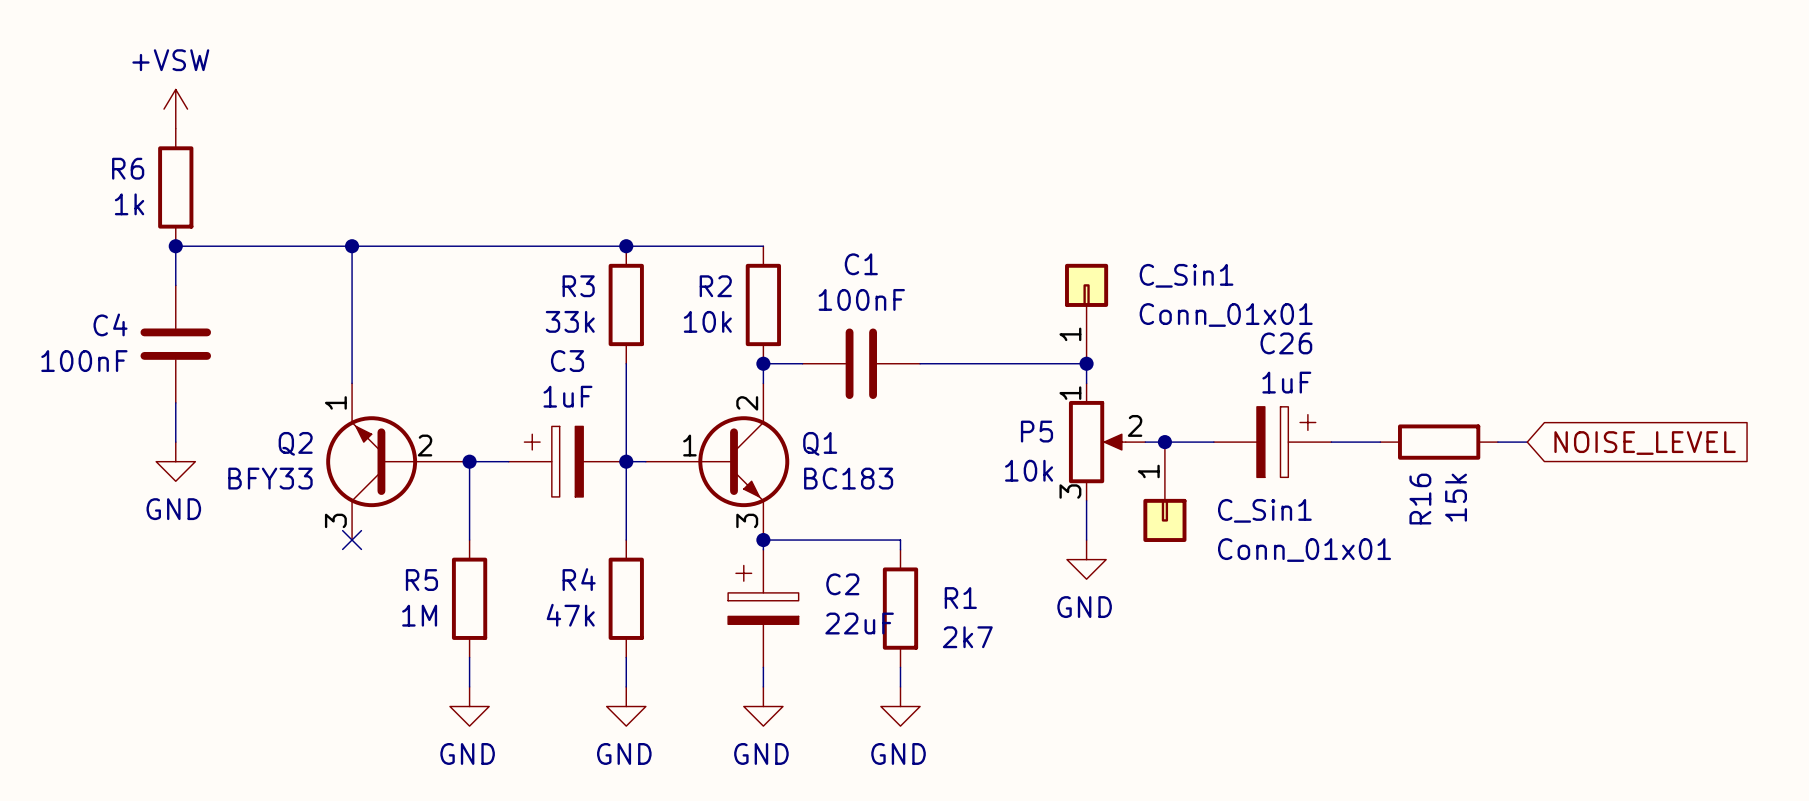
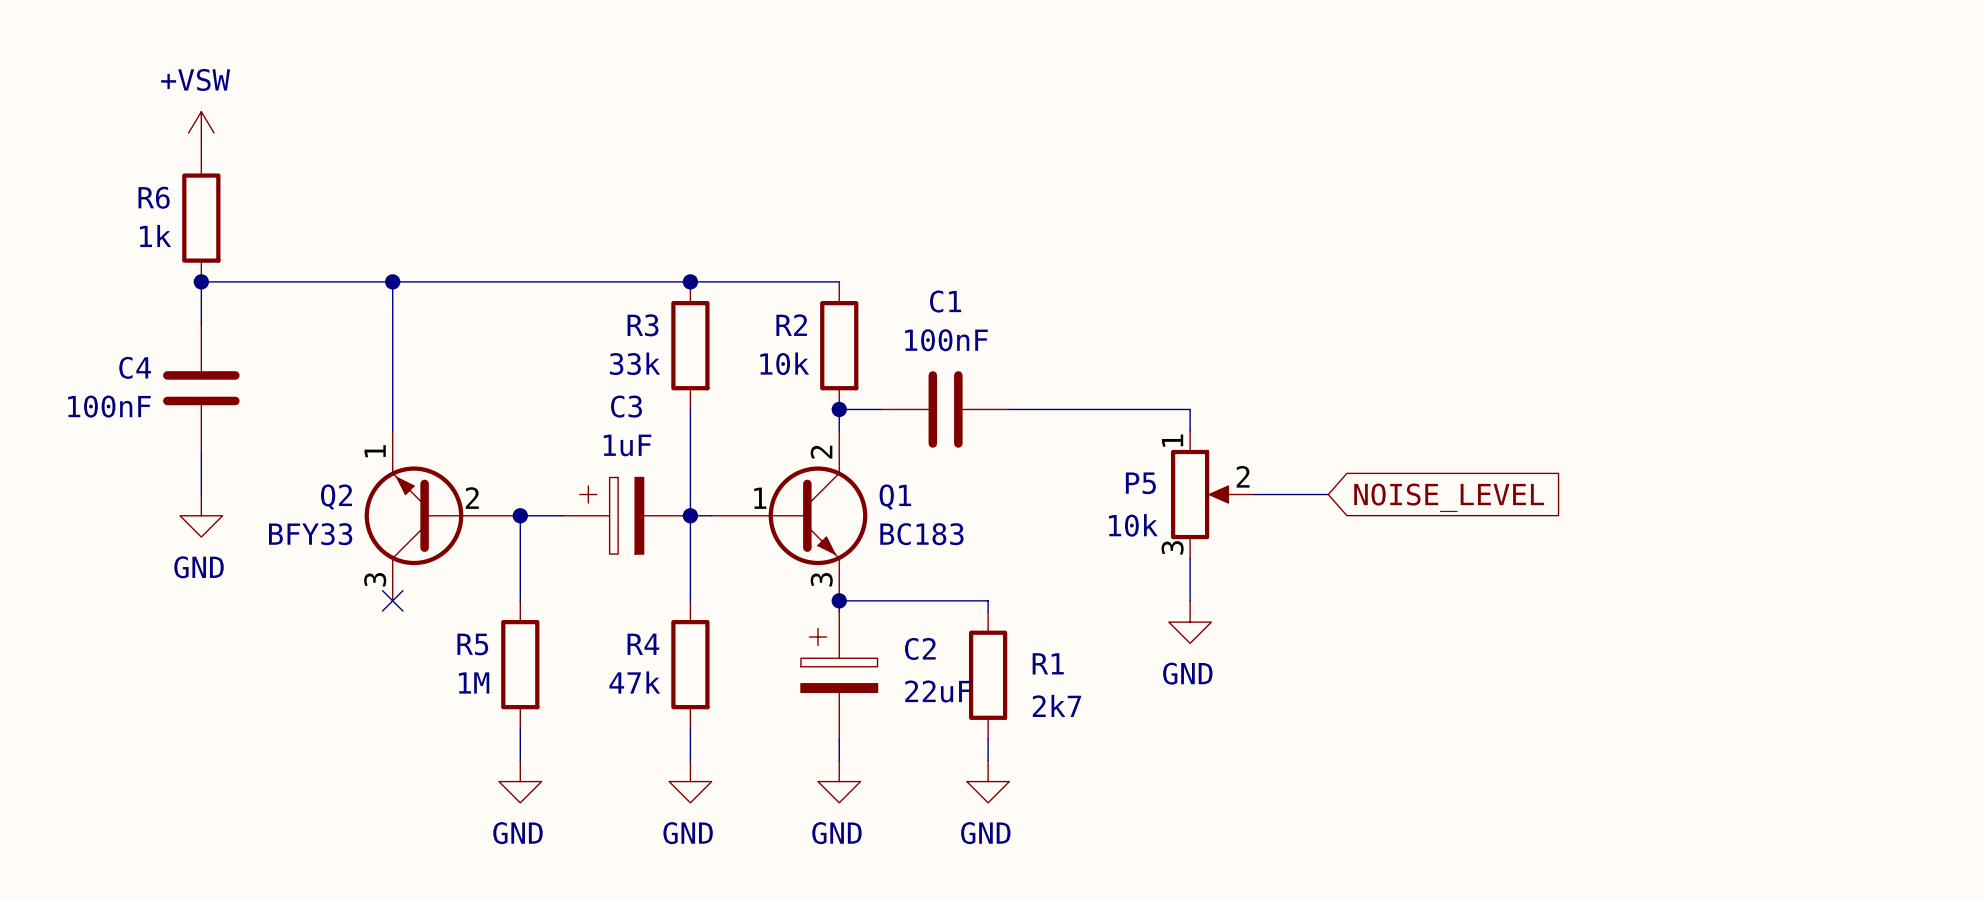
C_Sin1: Conn_01x01 (1086, 313) -> none
junction: (1086, 363) -> none
junction: (1164, 442) -> none
C26: 1uF (1272, 442) -> none
wire: (1331, 442) (1380, 442) -> none
R16: 15k (1439, 442) -> none
wire: (1497, 442) (1527, 442) -> none
global label position: NOISE_LEVEL (1645, 443) -> NOISE_LEVEL (1449, 497)
C_Sin1: Conn_01x01 (1164, 492) -> none

